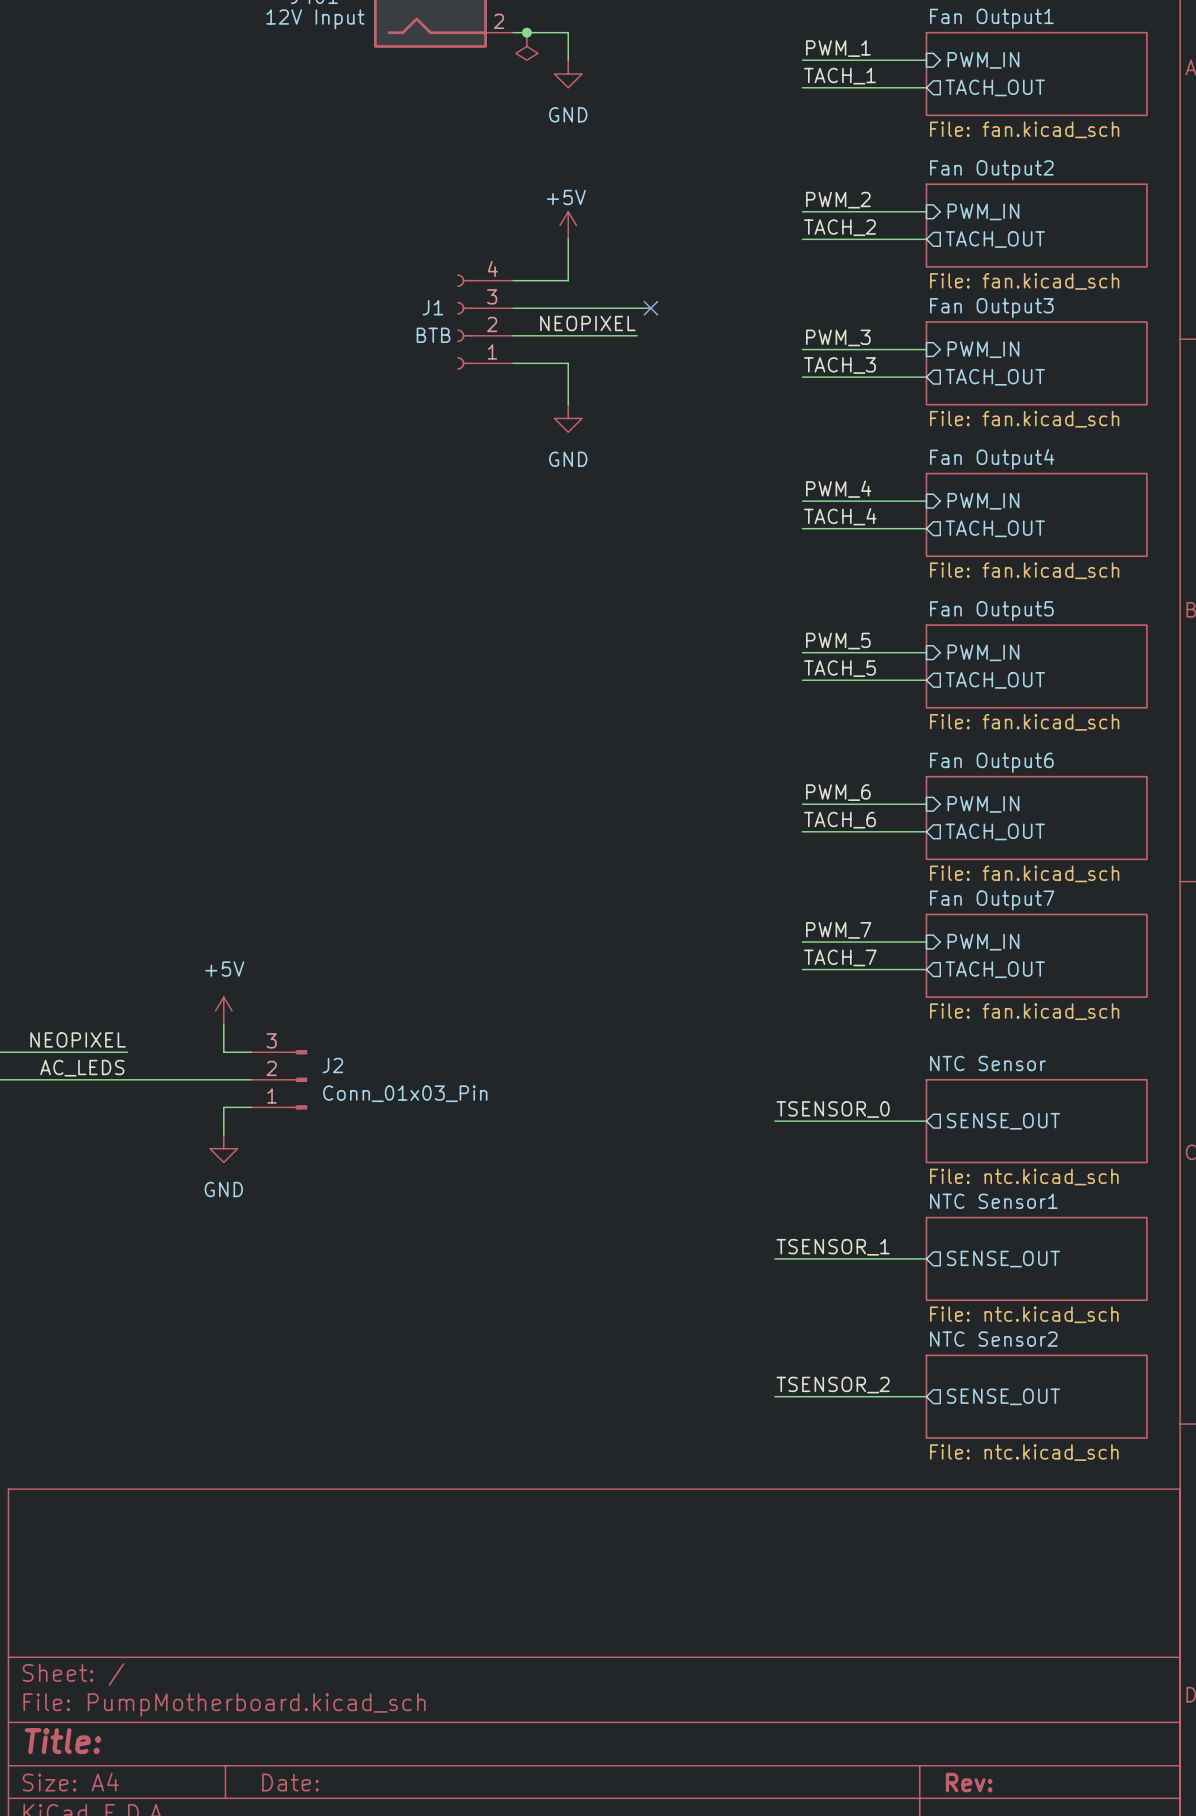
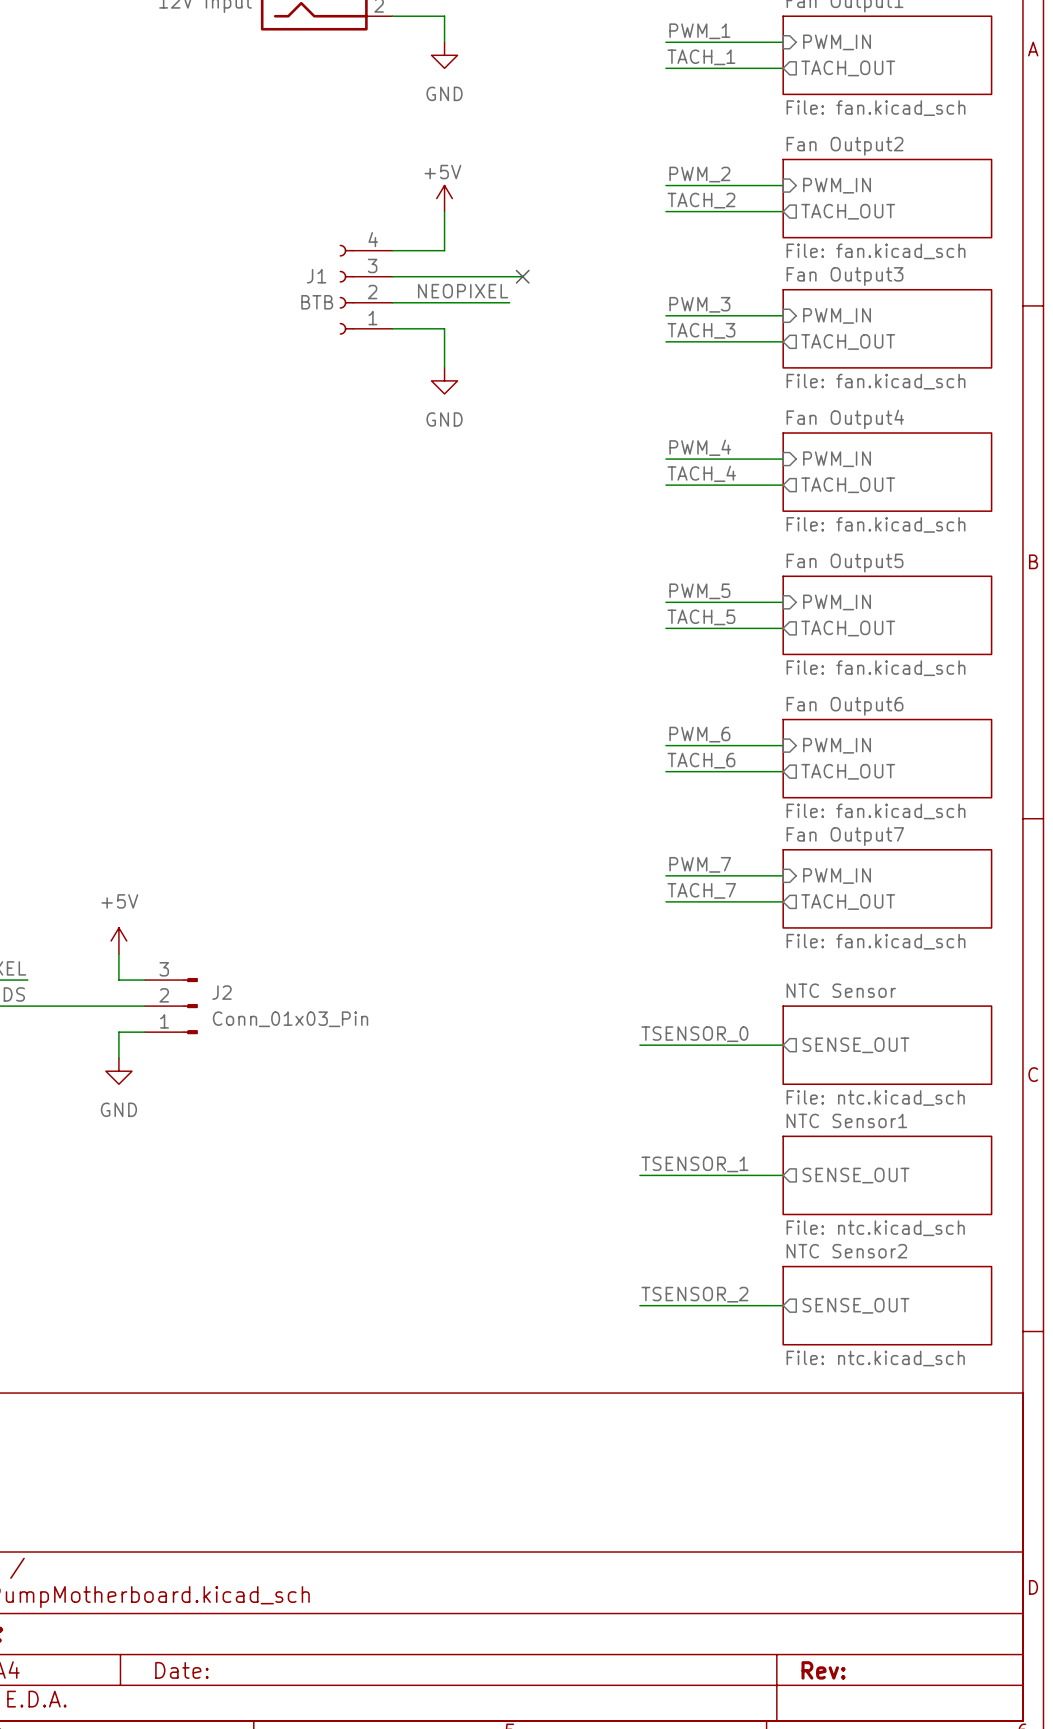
junction: (526, 32) -> none
power symbol: (526, 46) -> none

